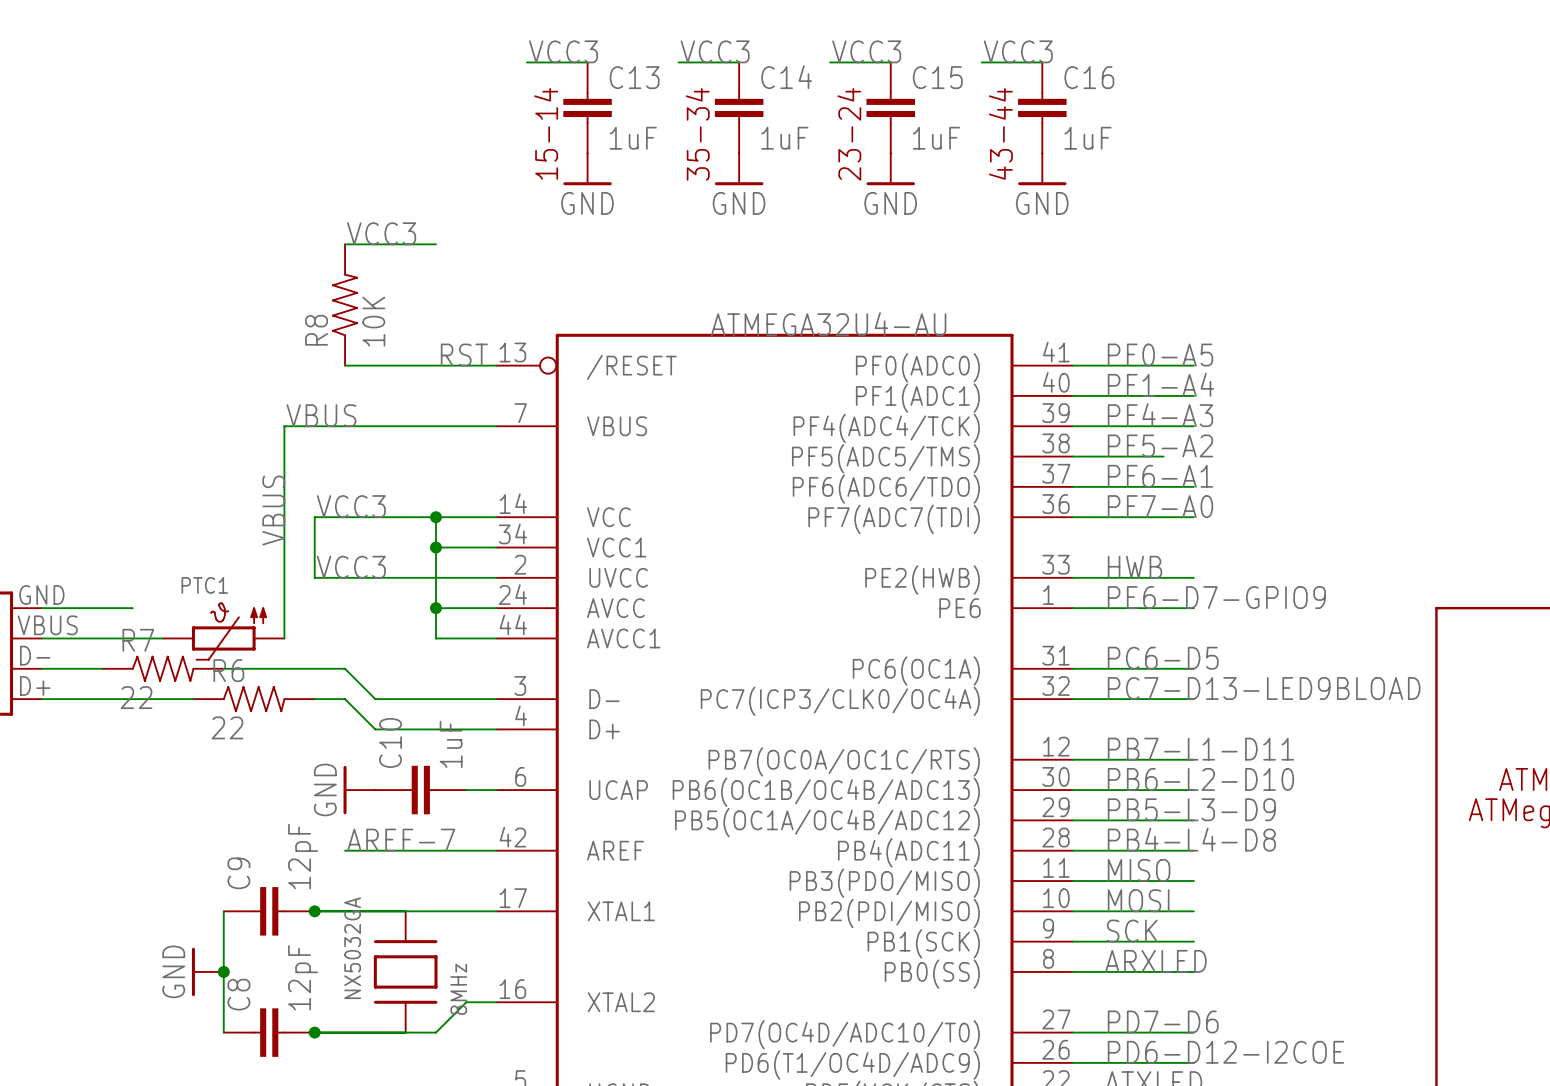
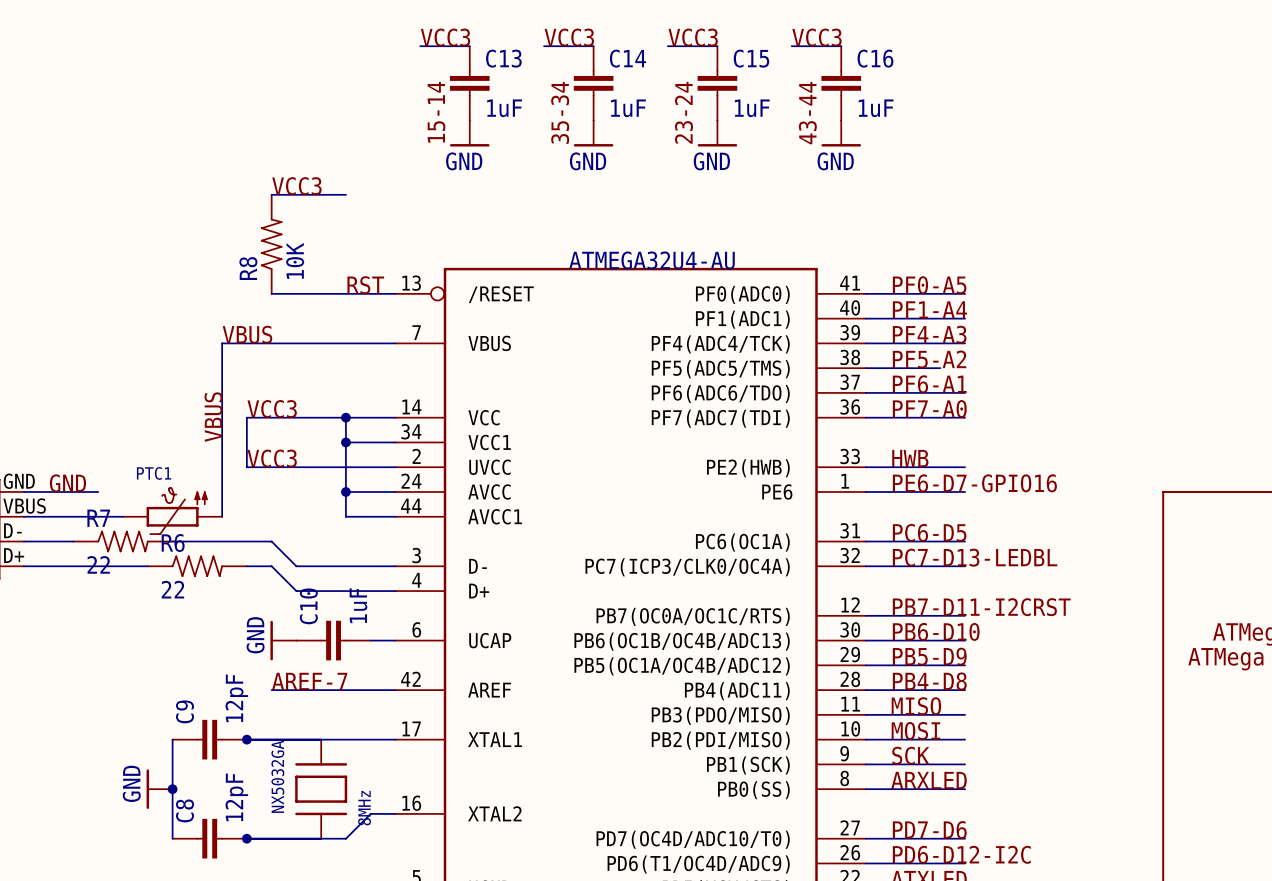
label: none -> GND (67, 483)
label: PE6-D7-GPIO9 (1216, 597) -> PE6-D7-GPIO16 (974, 483)
label: PC7-D13-LED9BLOAD (1264, 688) -> PC7-D13-LEDBL (975, 557)
label: PB7-L1-D11 (1200, 749) -> PB7-D11-I2CRST (981, 607)
label: PB6-L2-D10 (1200, 779) -> PB6-D10 (936, 631)
label: PB5-L3-D9 (1191, 809) -> PB5-D9 (929, 656)
label: PB4-L4-D8 (1191, 839) -> PB4-D8 (929, 681)
label: PD6-D12-I2COE (1225, 1052) -> PD6-D12-I2C (961, 854)

